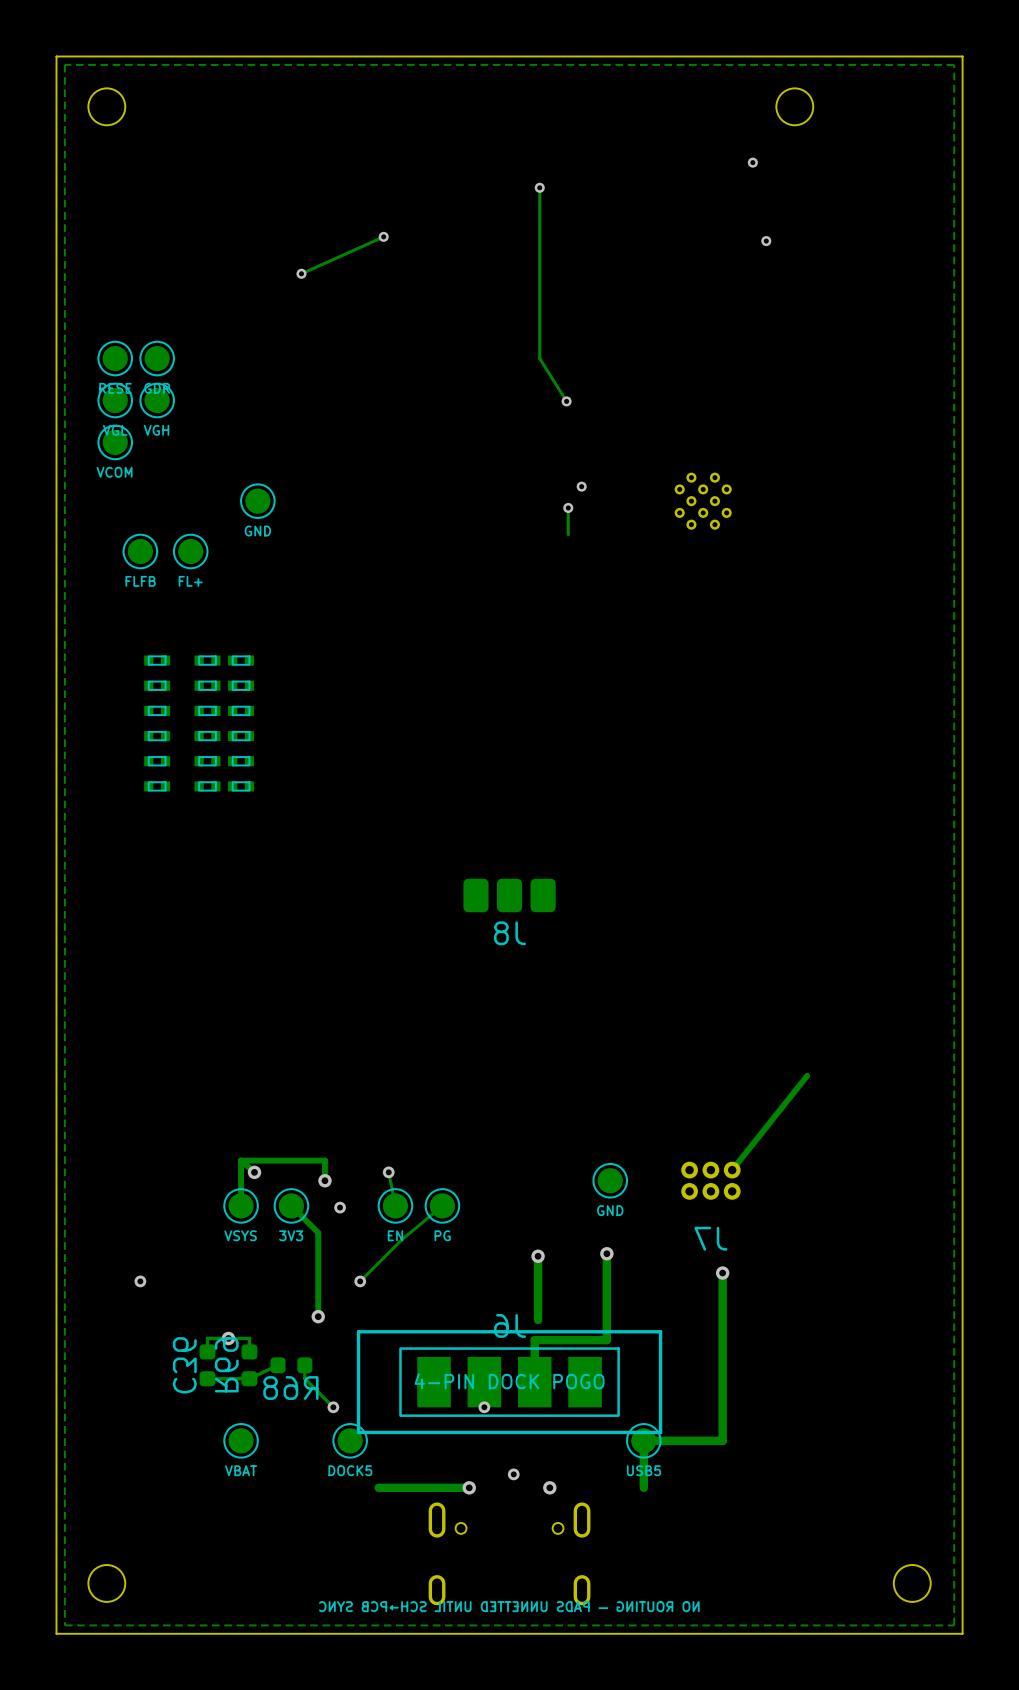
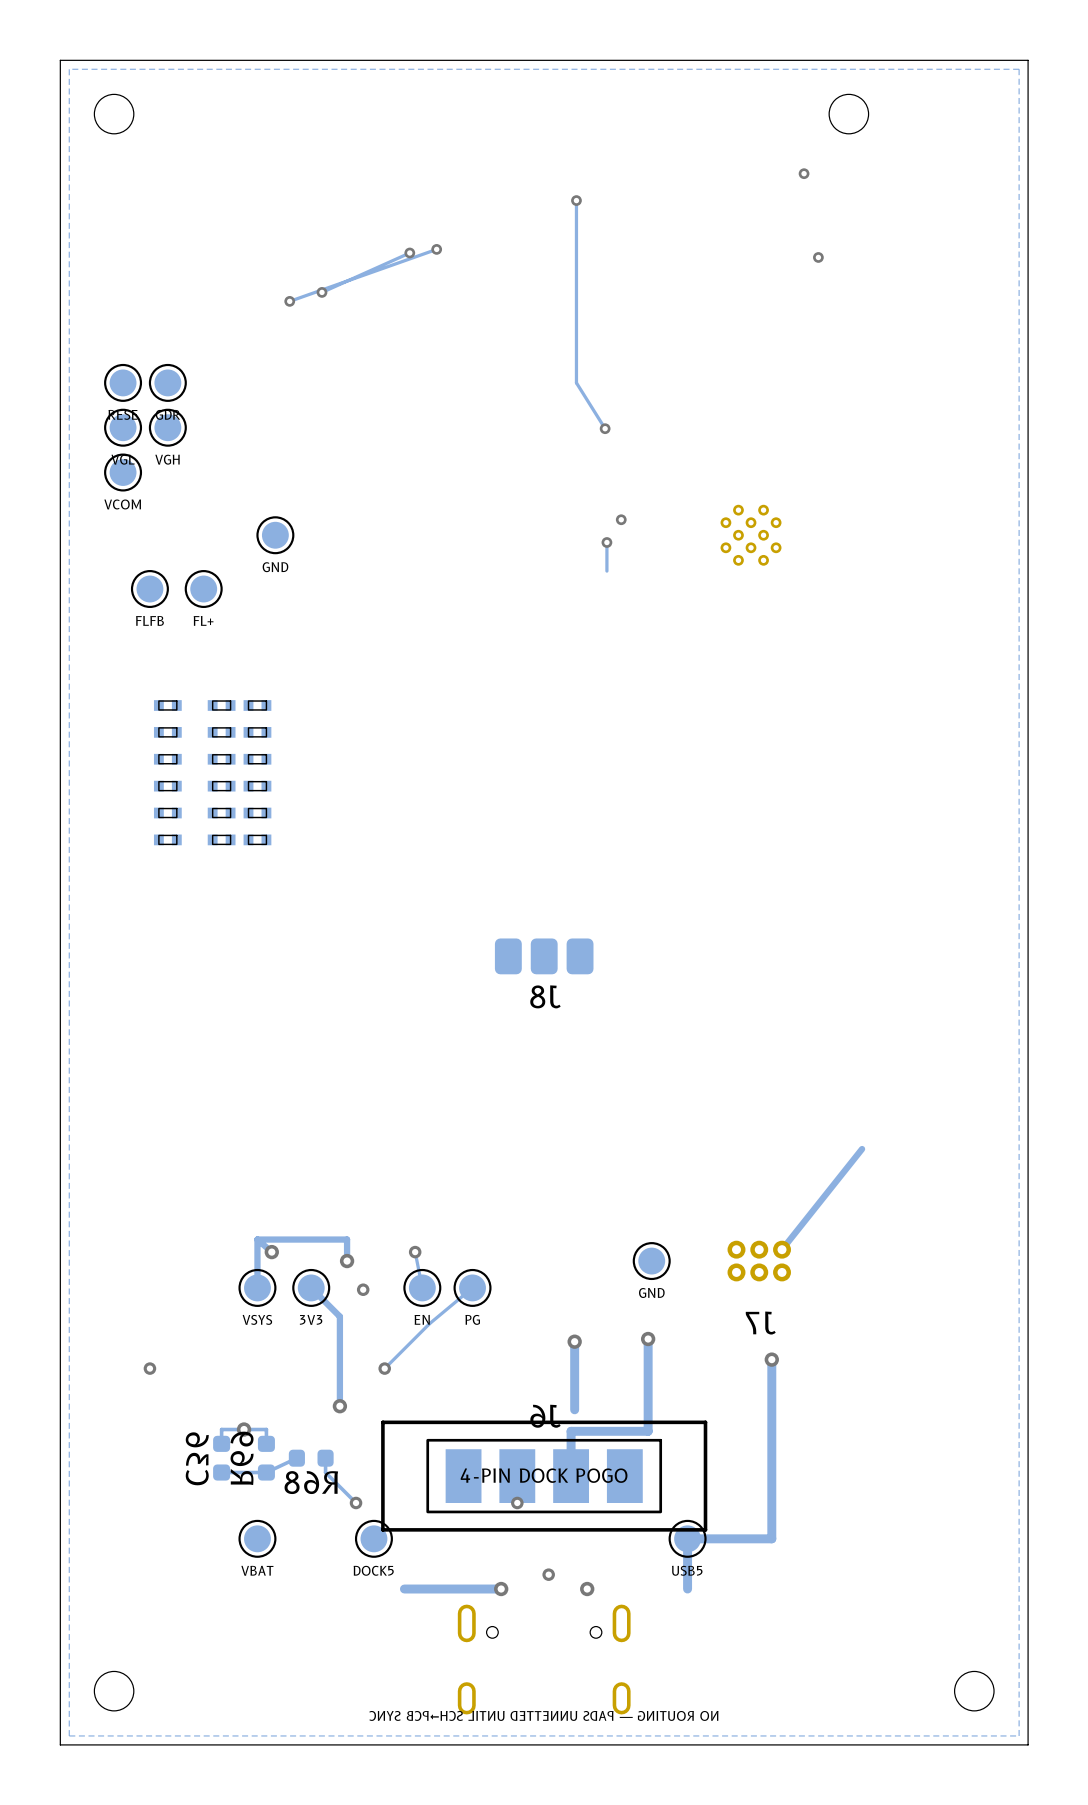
track: none -> (436, 249) (289, 301)
via: none -> (436, 249)
via: none -> (289, 301)

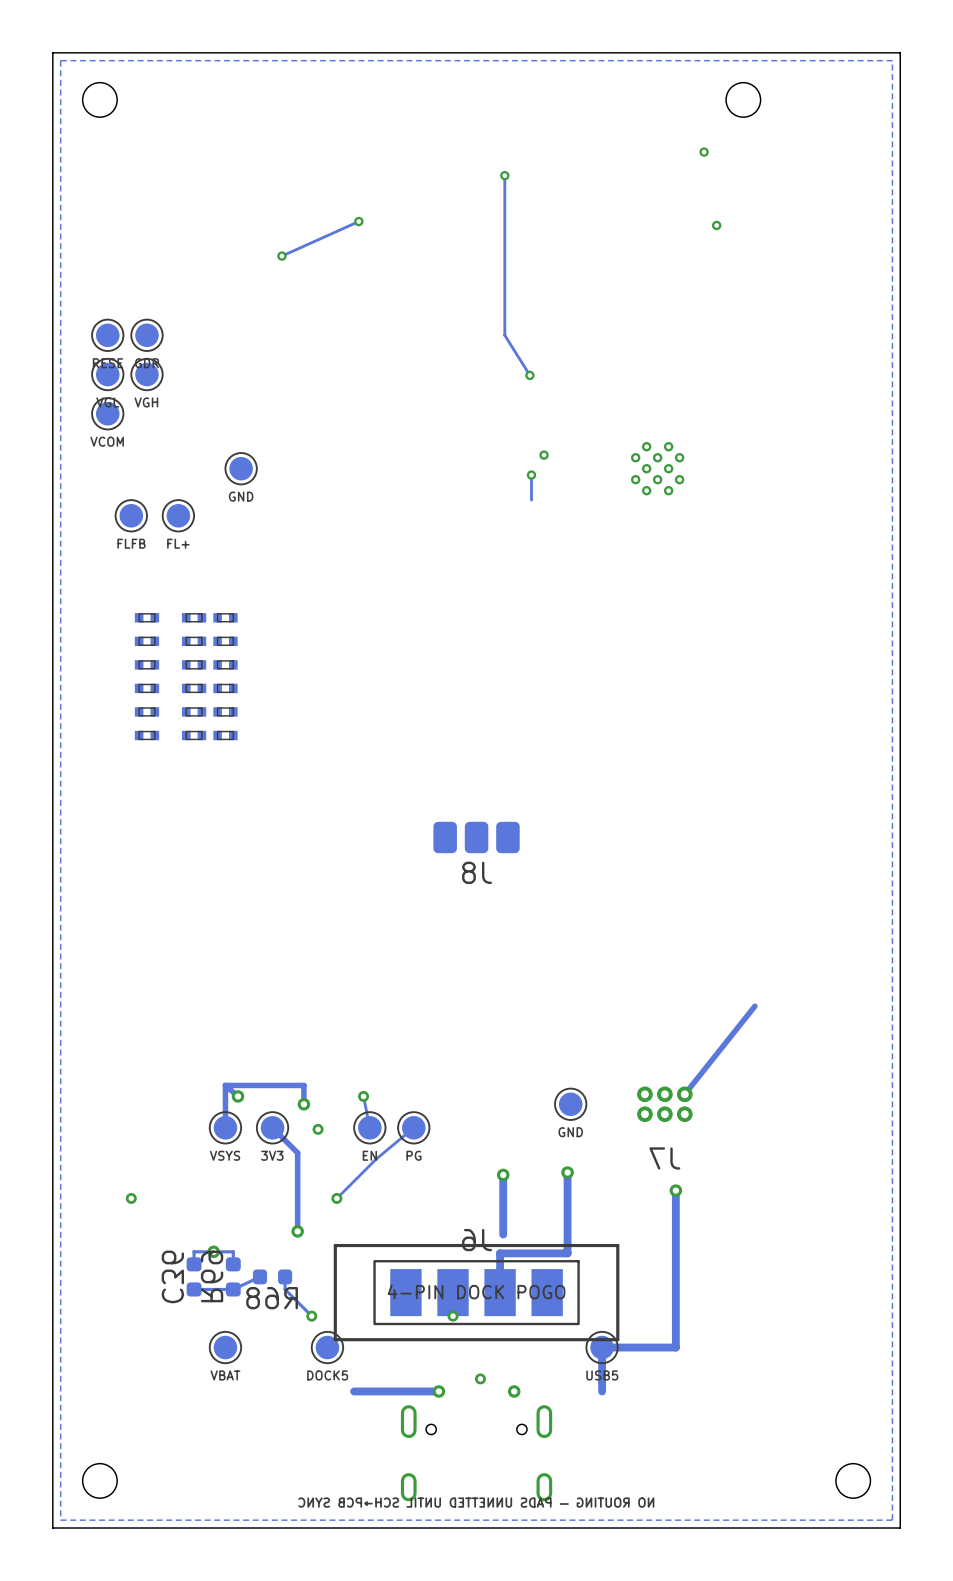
track: (436, 249) (289, 301) -> none
via: (436, 249) -> none
via: (289, 301) -> none

